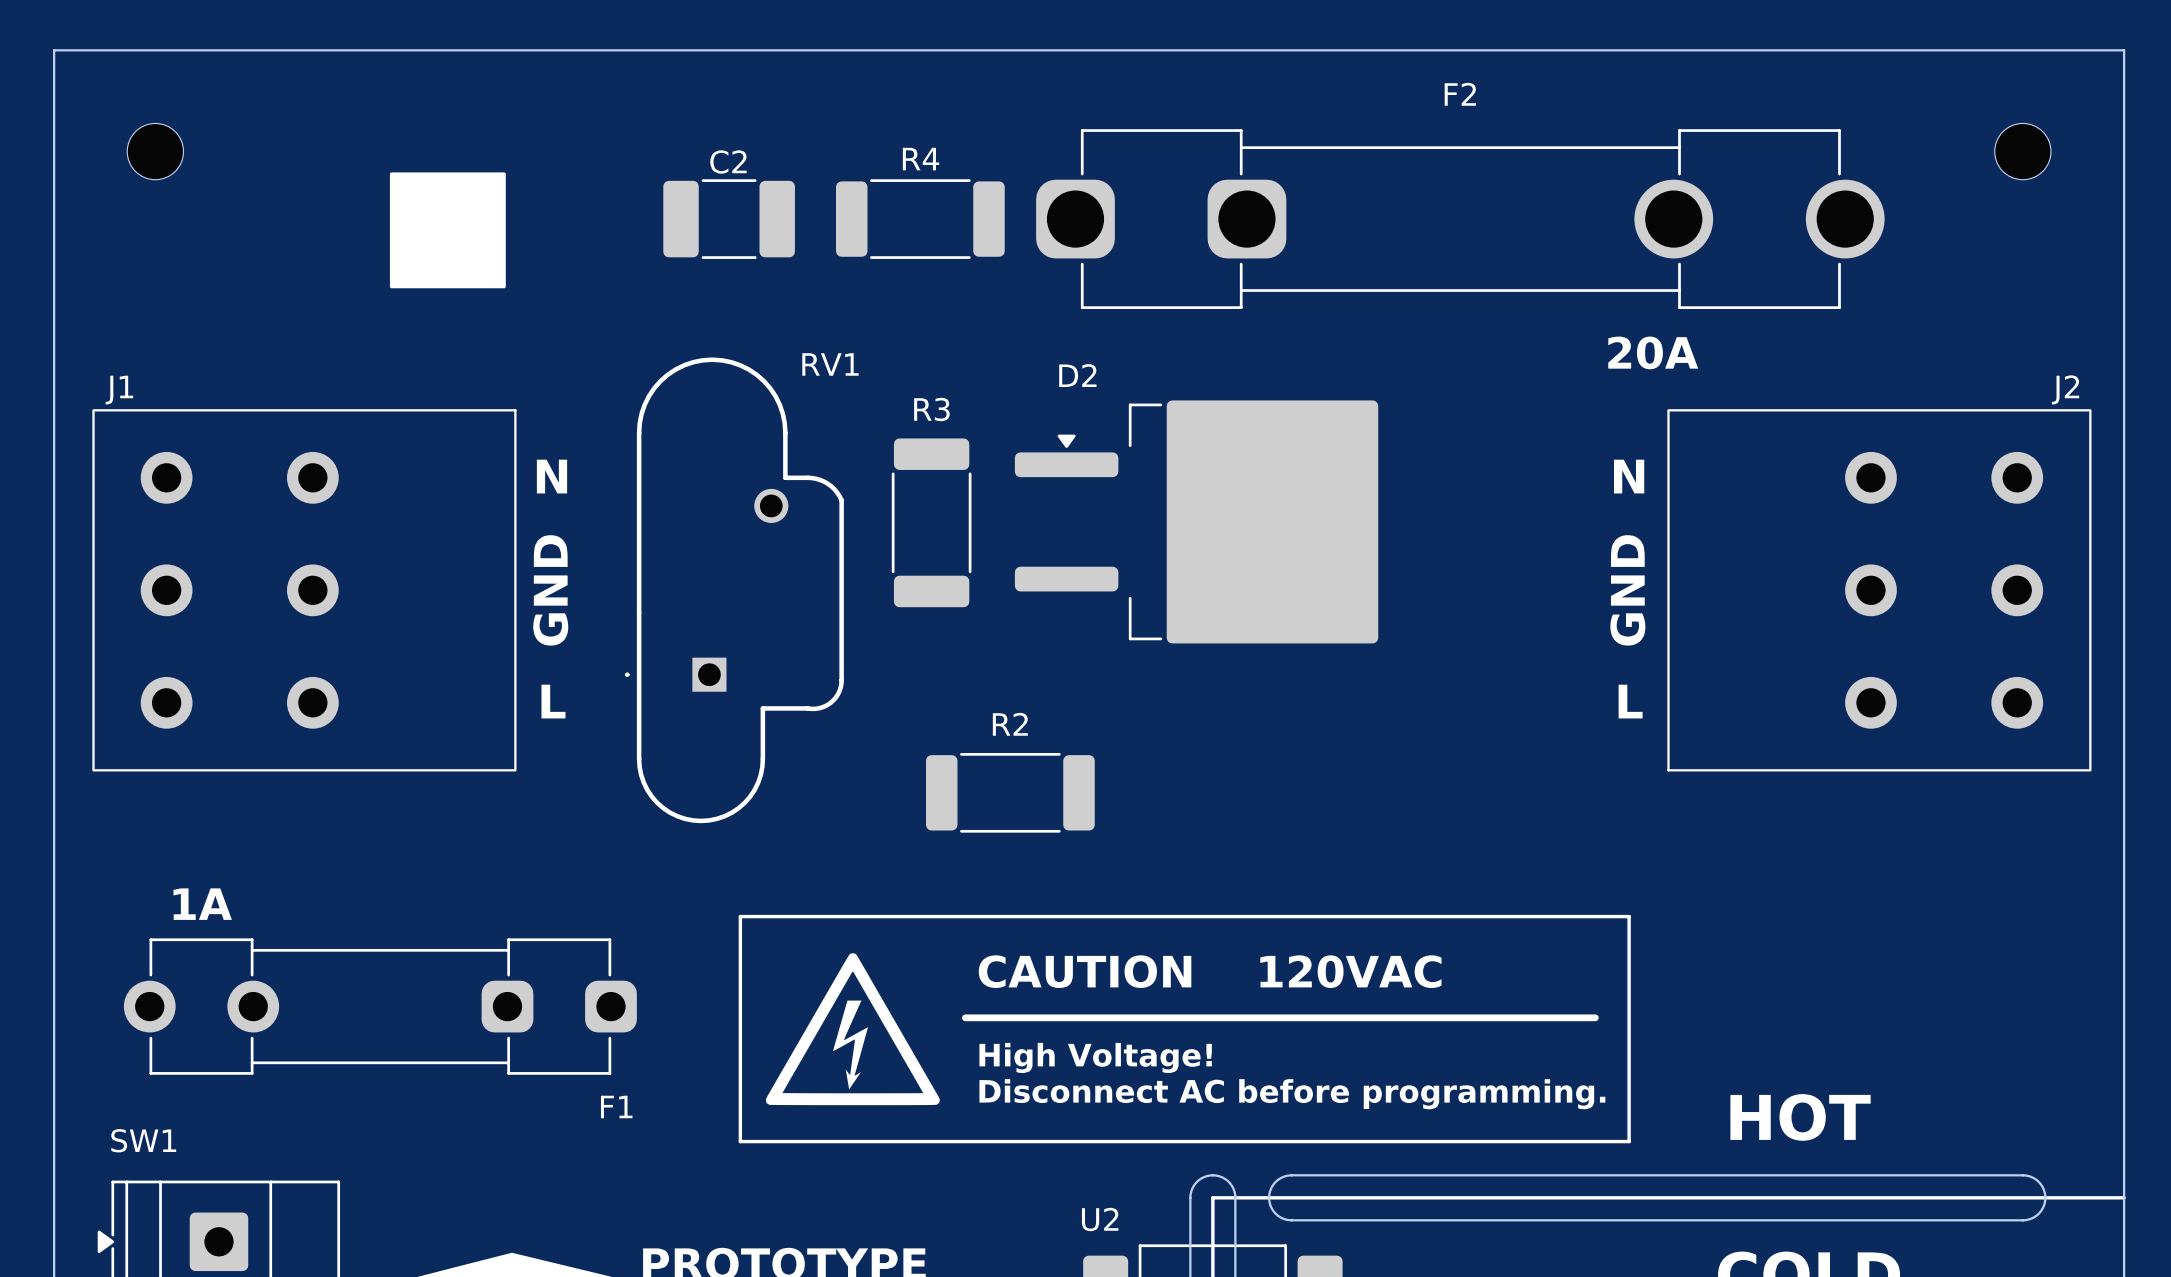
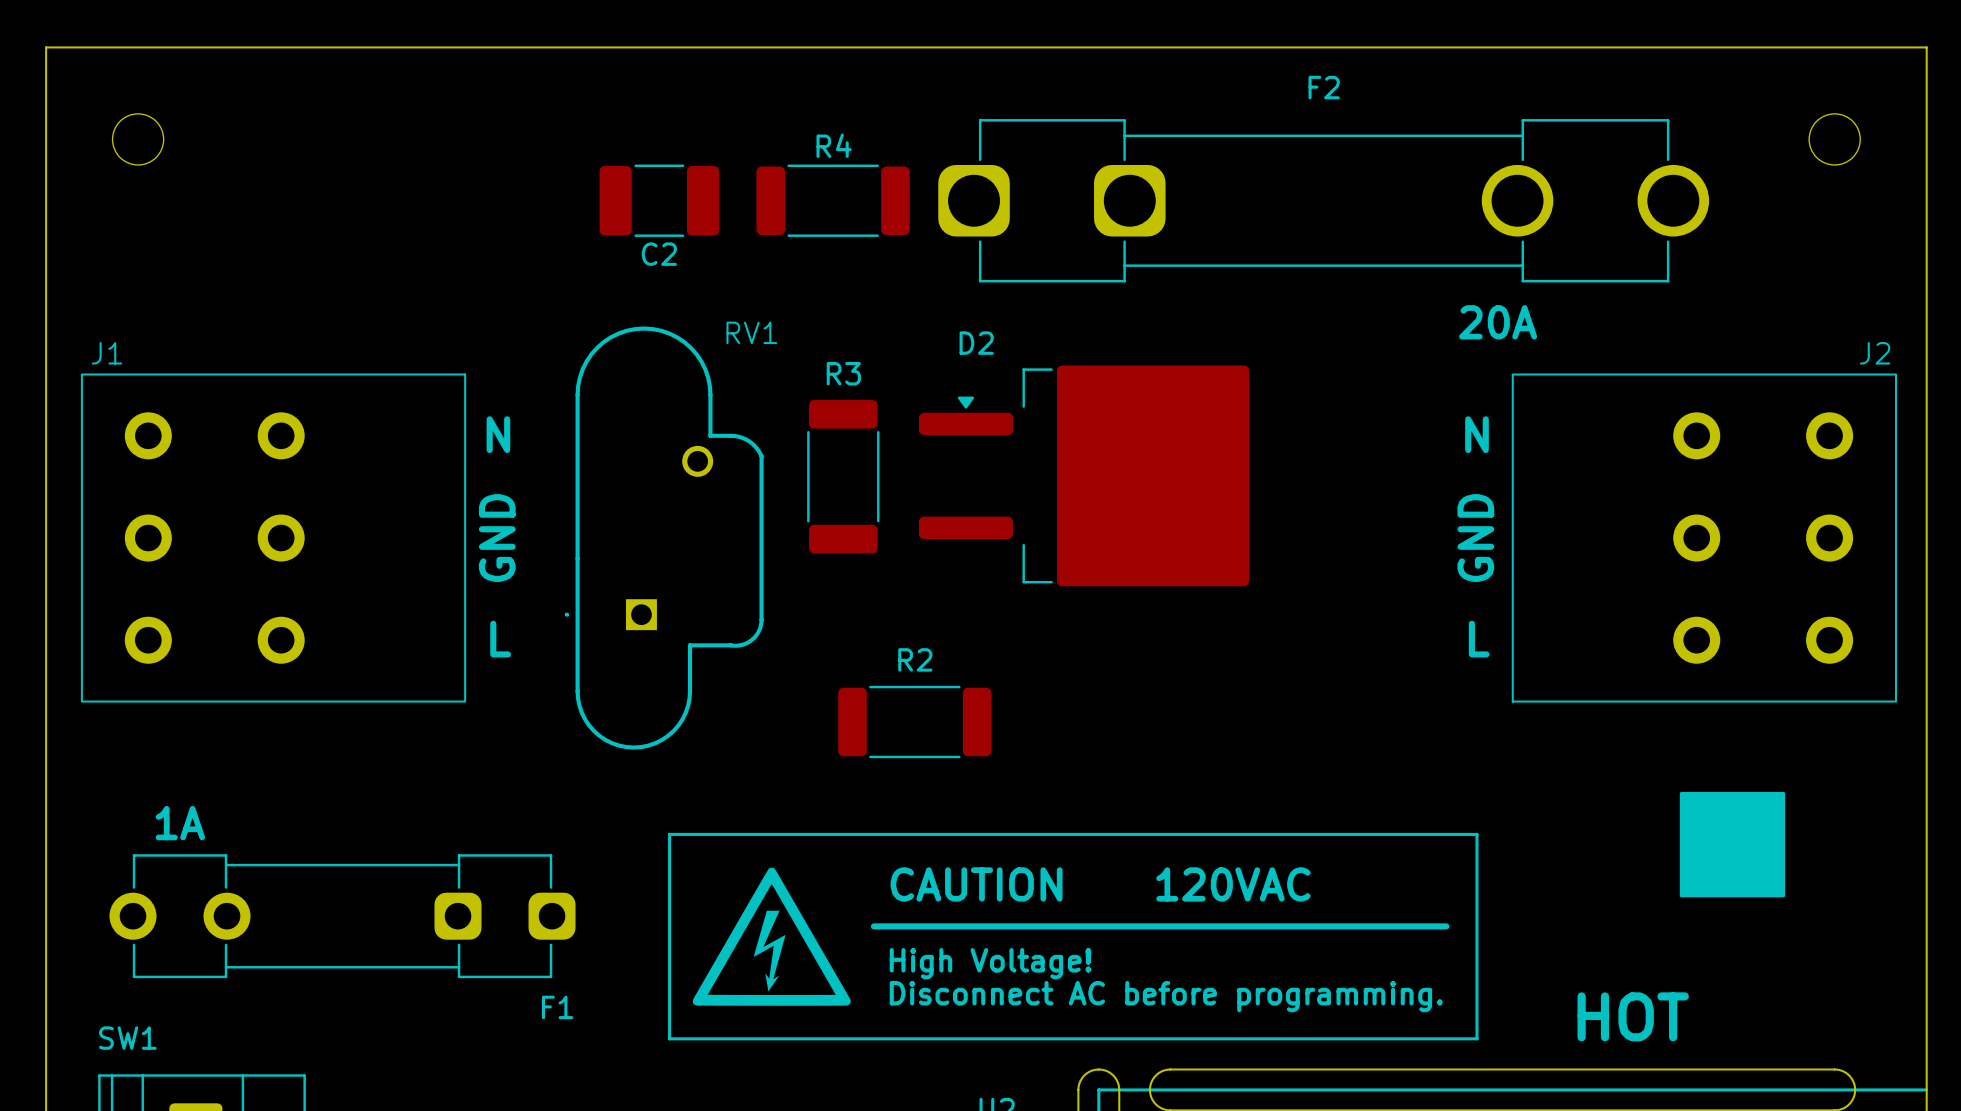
C2 name position: C2 (728, 162) -> C2 (659, 254)
drawing: [389, 172, 506, 289] -> none
drawing: none -> [1679, 792, 1786, 898]

